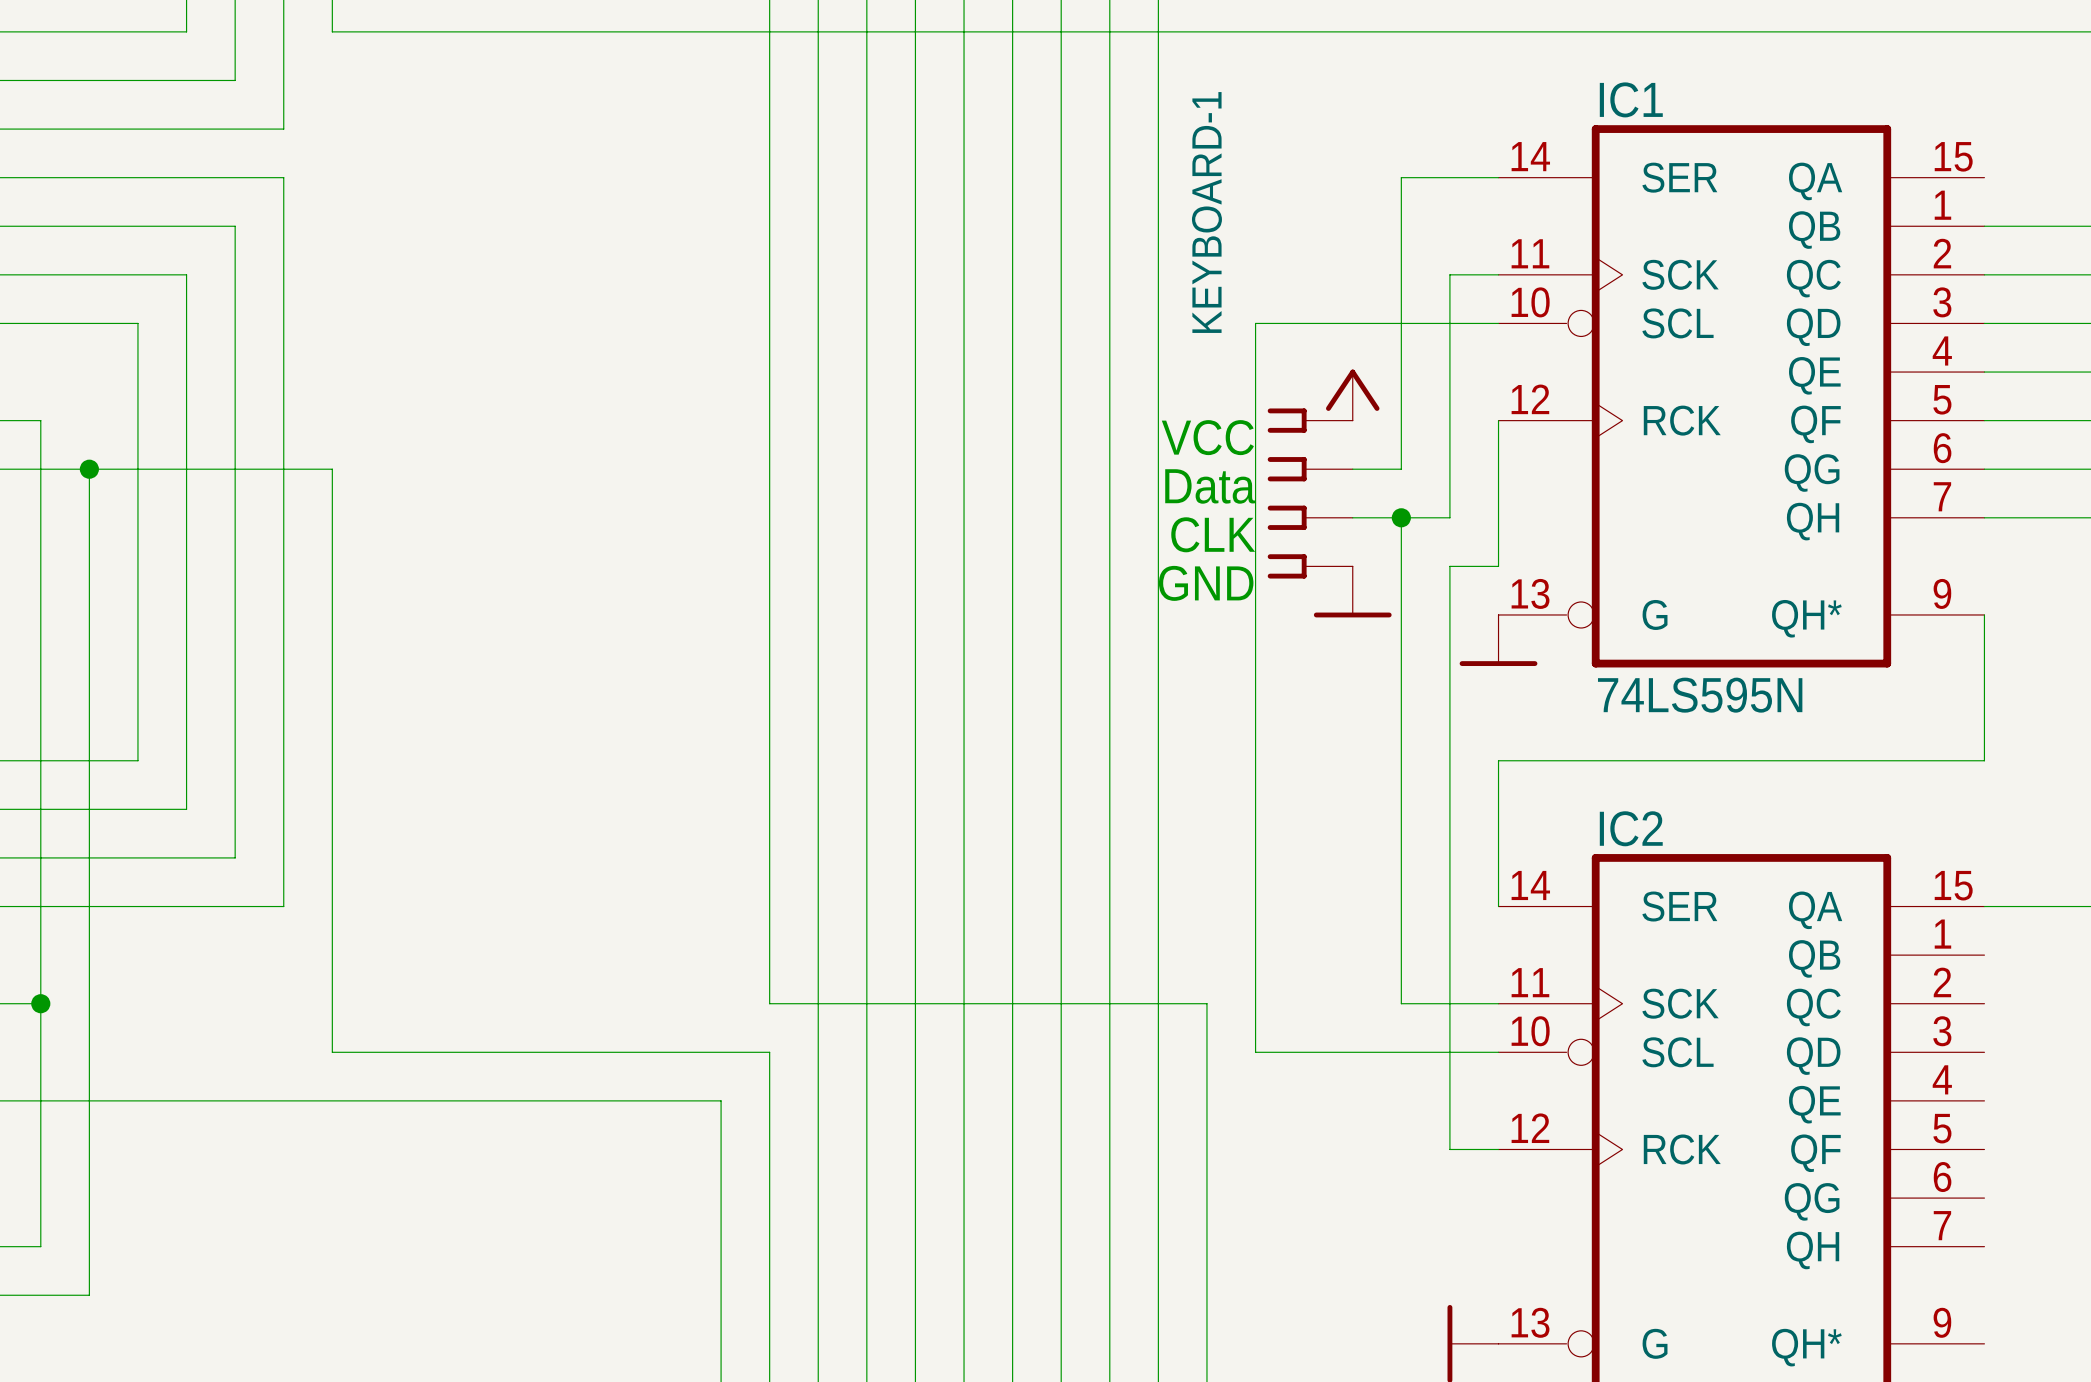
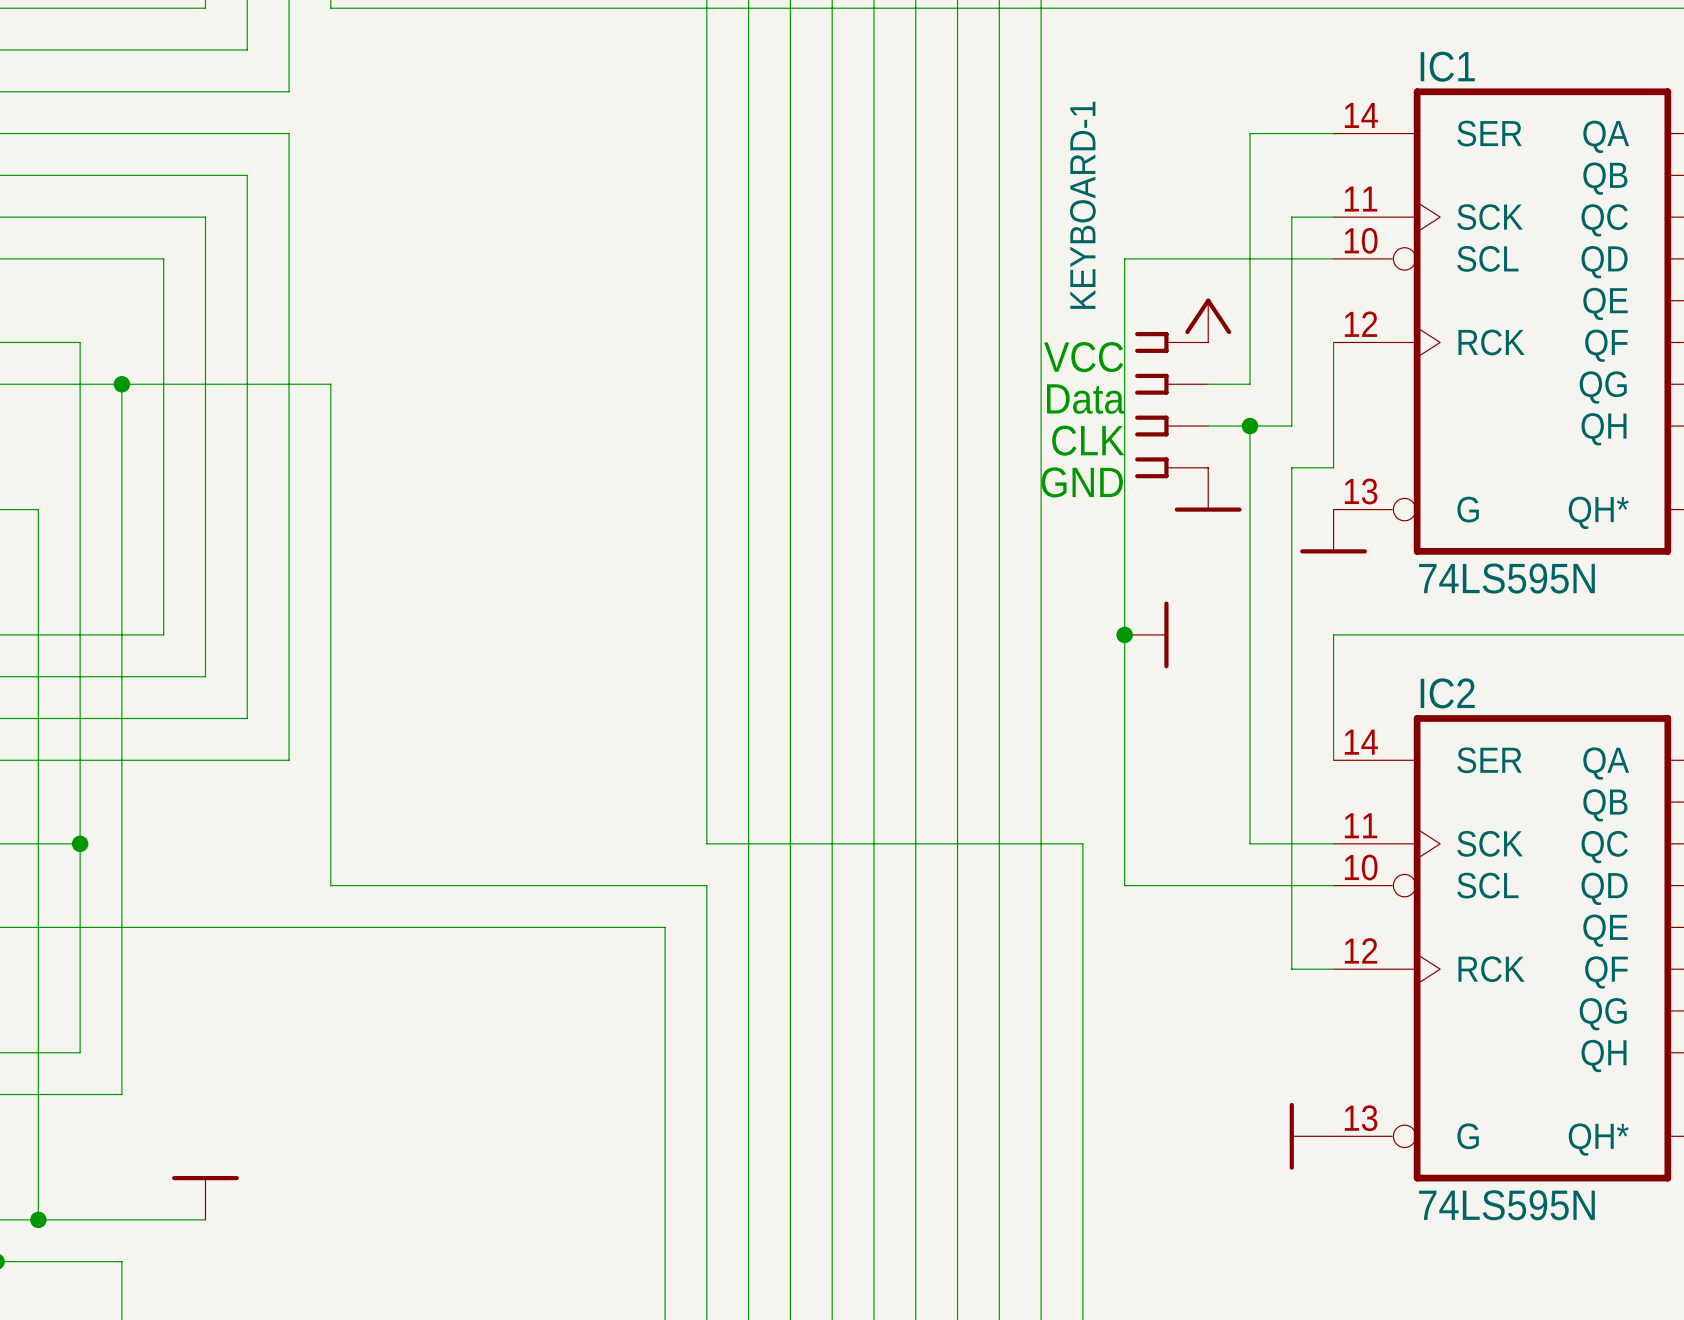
KEYBOARD-1 name position: KEYBOARD-1 (1206, 212) -> KEYBOARD-1 (1082, 205)
junction: none -> (1124, 634)
power symbol: none -> (1146, 634)

